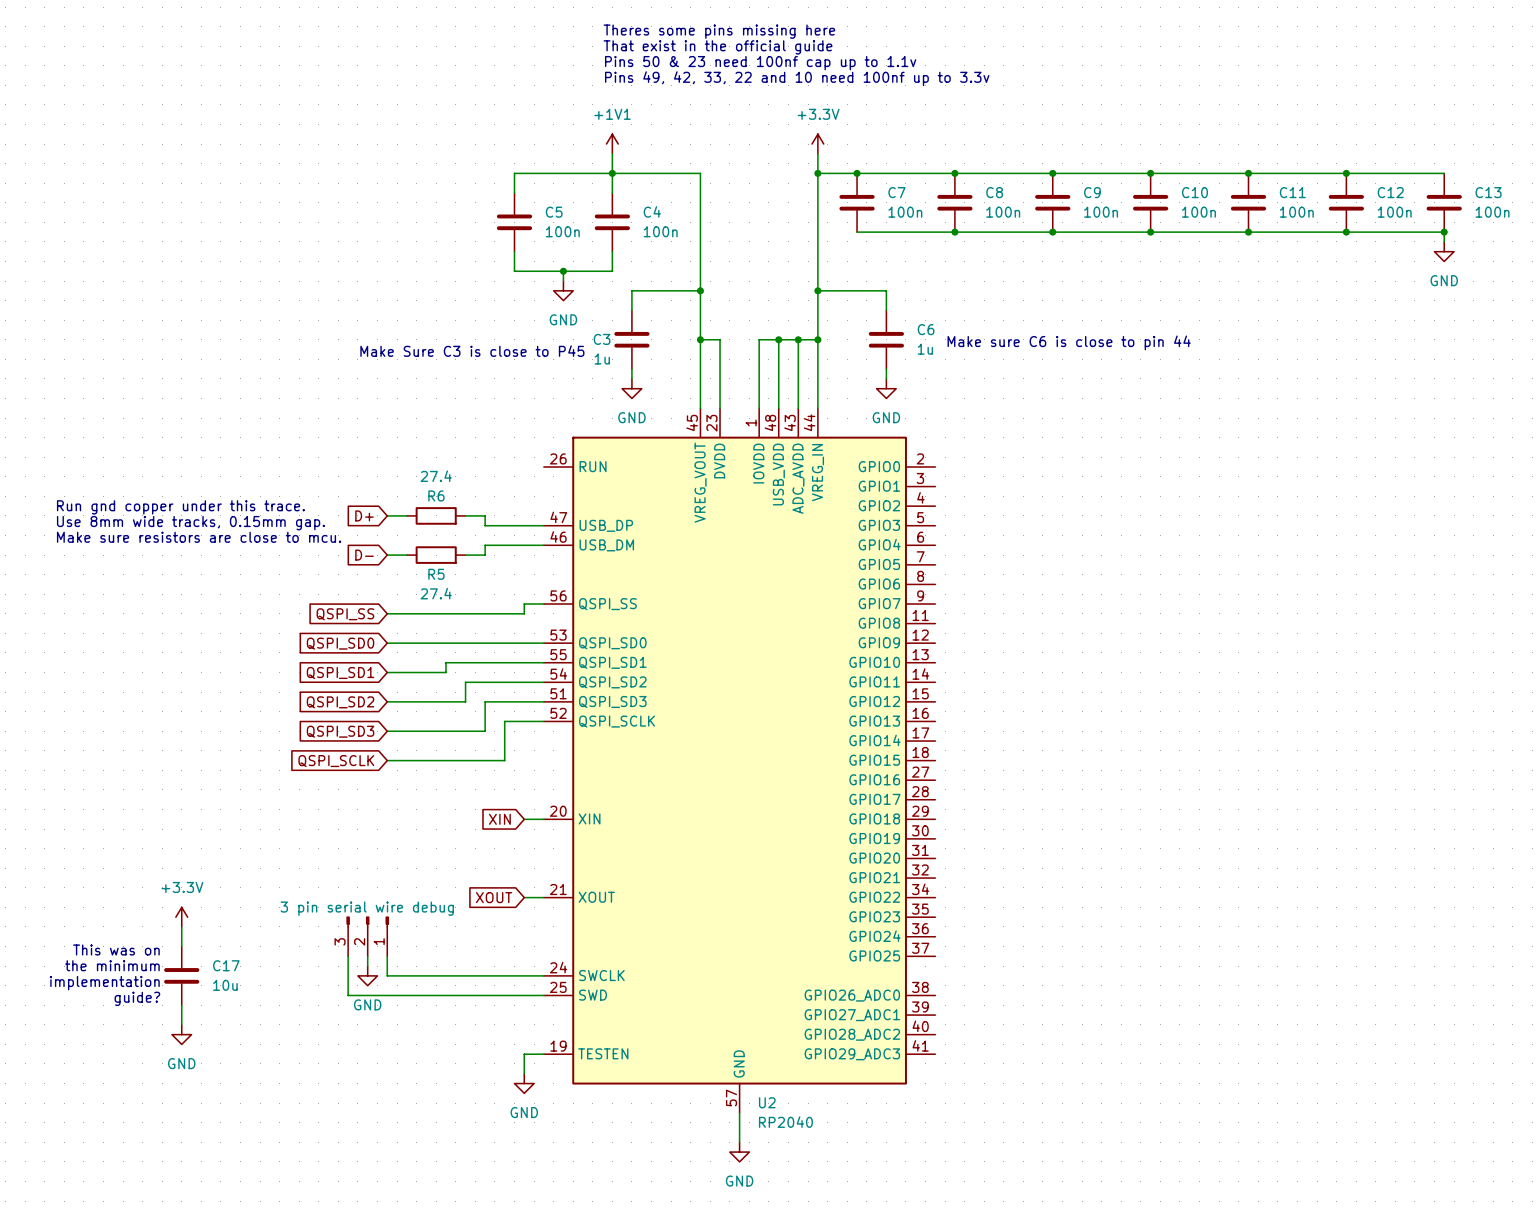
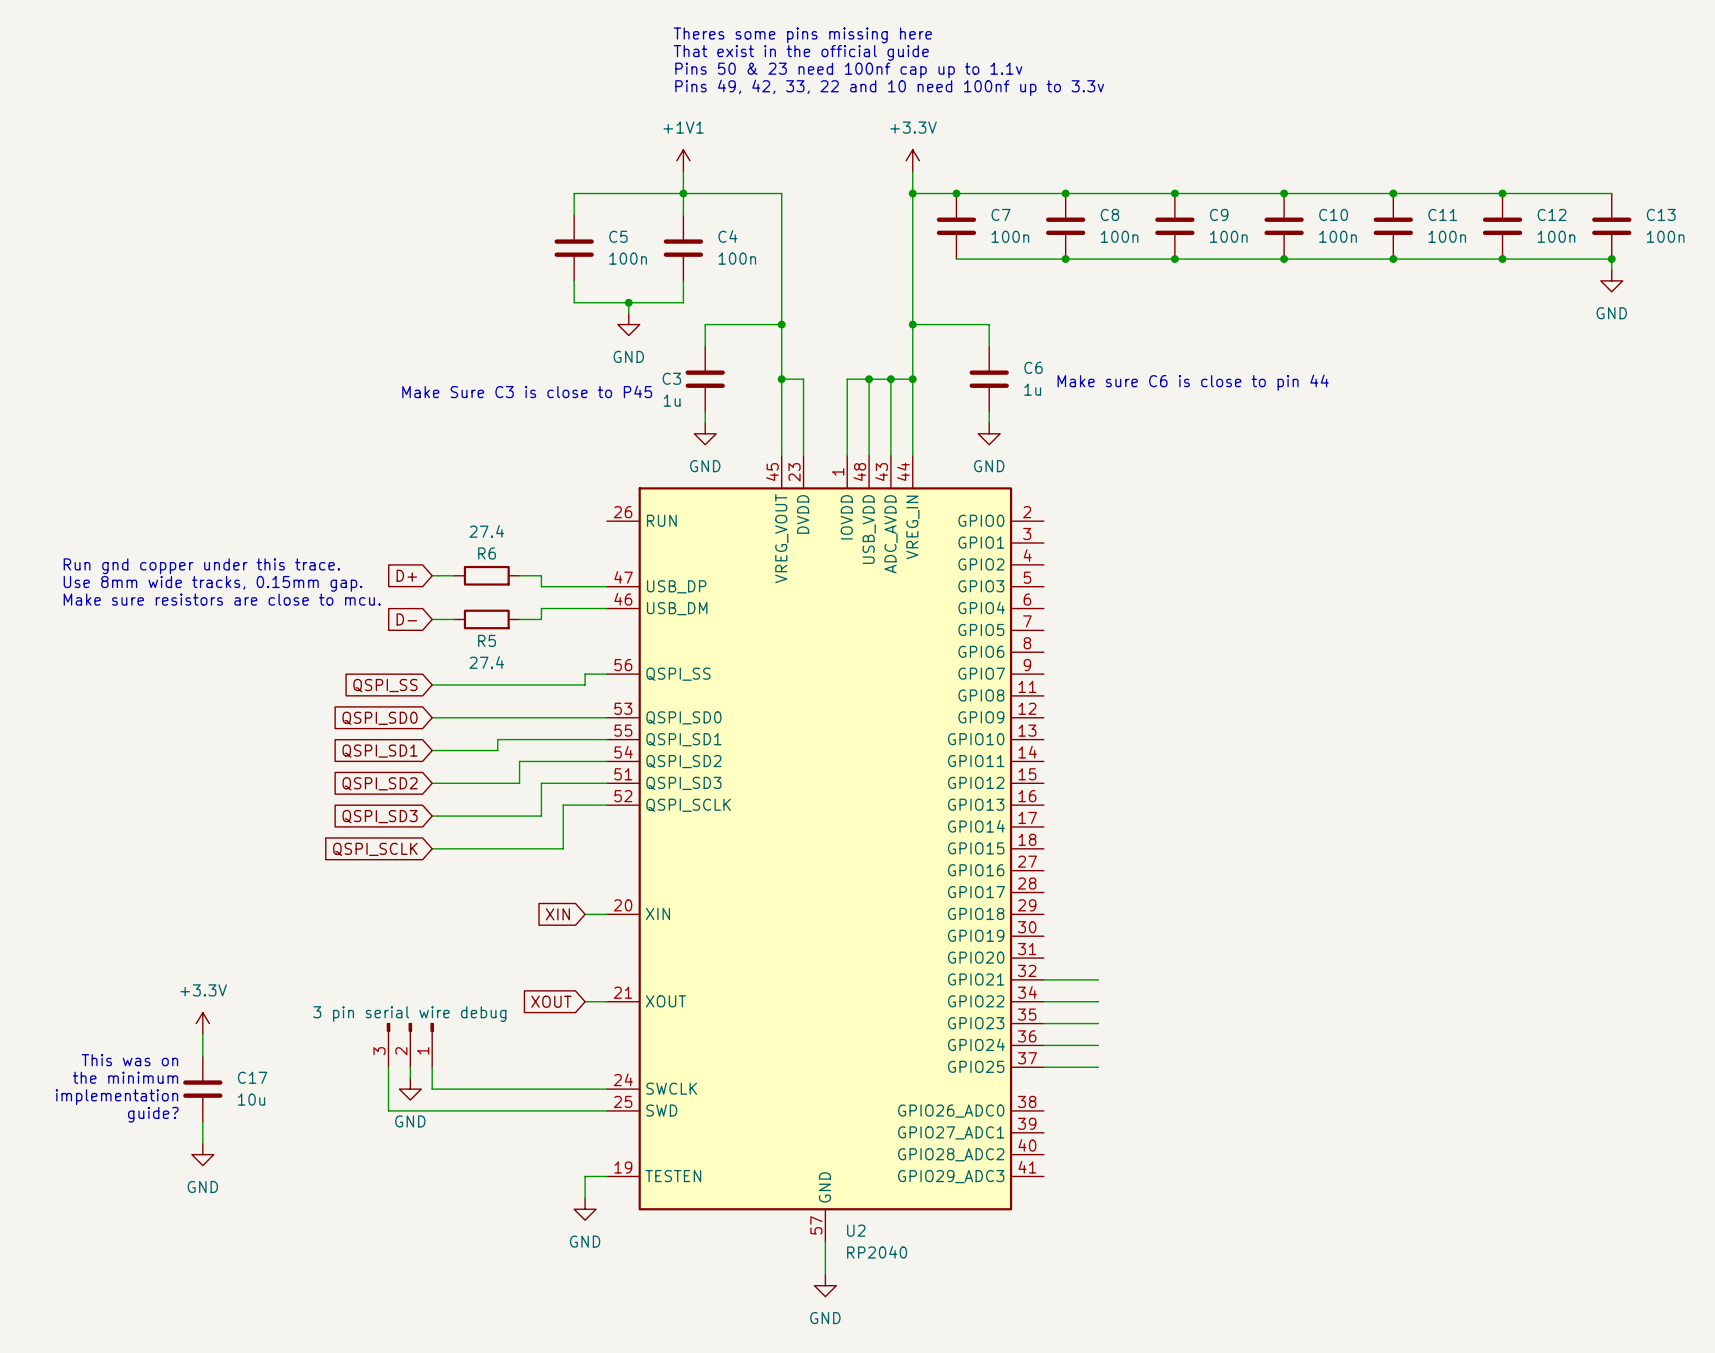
wire: none -> (1043, 979) (1098, 979)
wire: none -> (1043, 1001) (1098, 1001)
wire: none -> (1043, 1023) (1098, 1023)
wire: none -> (1043, 1045) (1098, 1045)
wire: none -> (1043, 1067) (1098, 1067)

